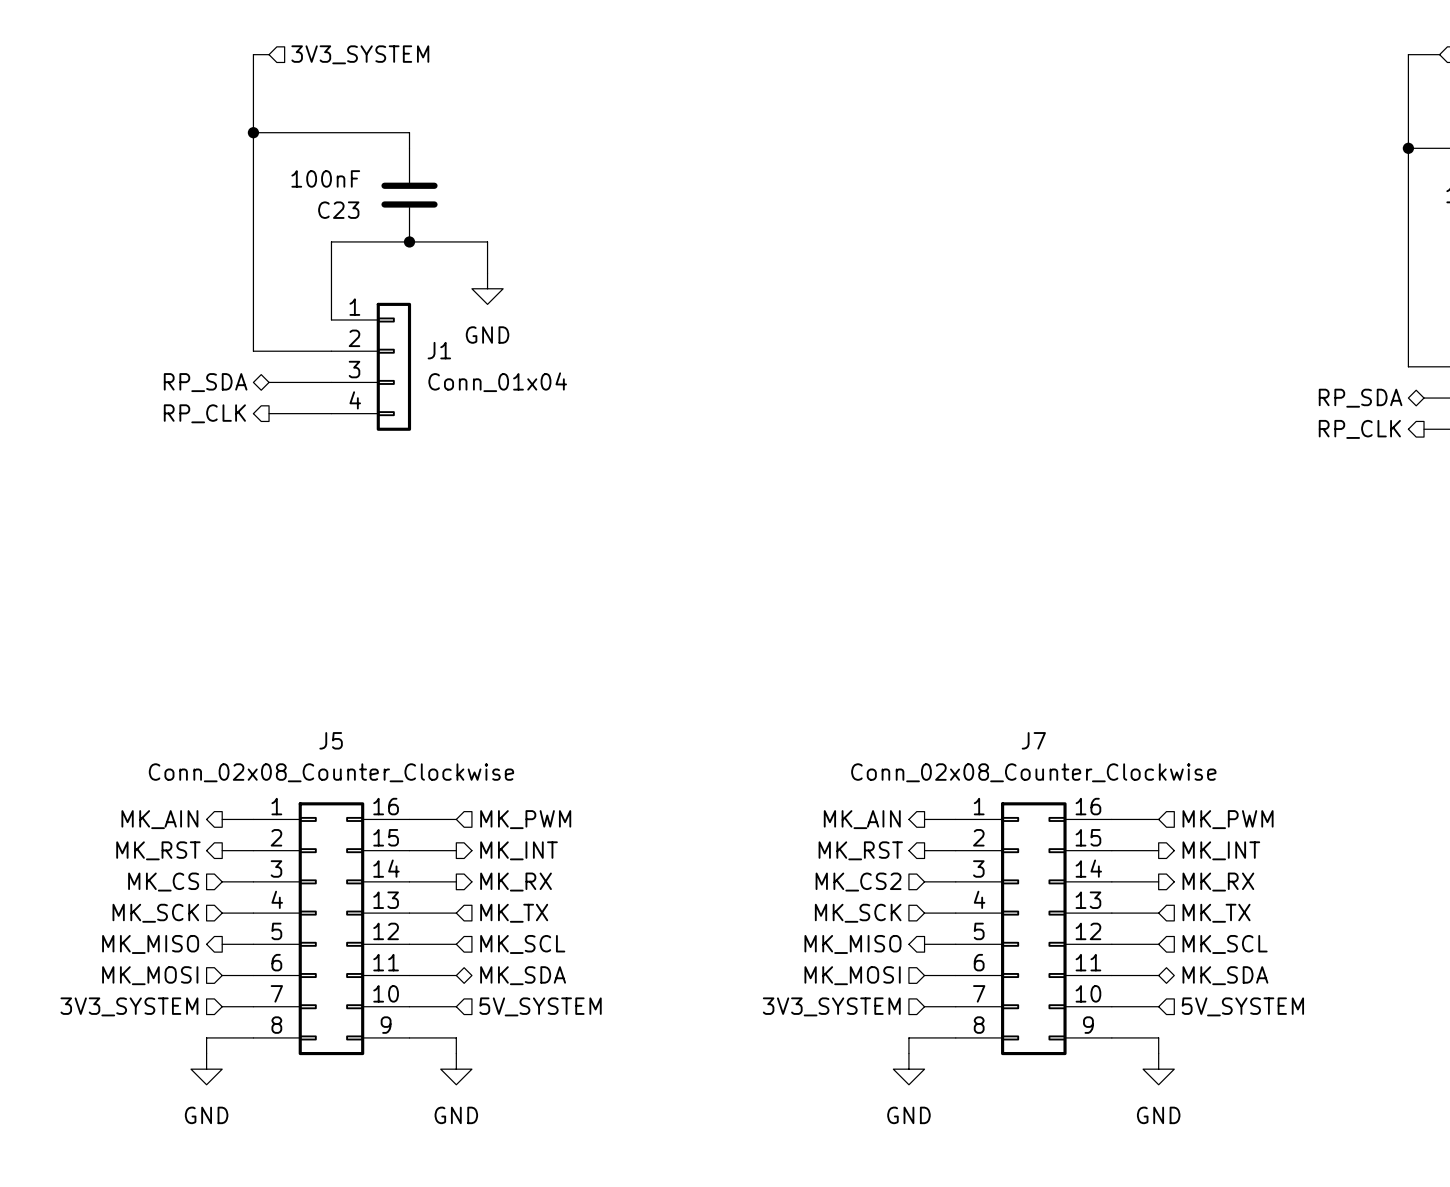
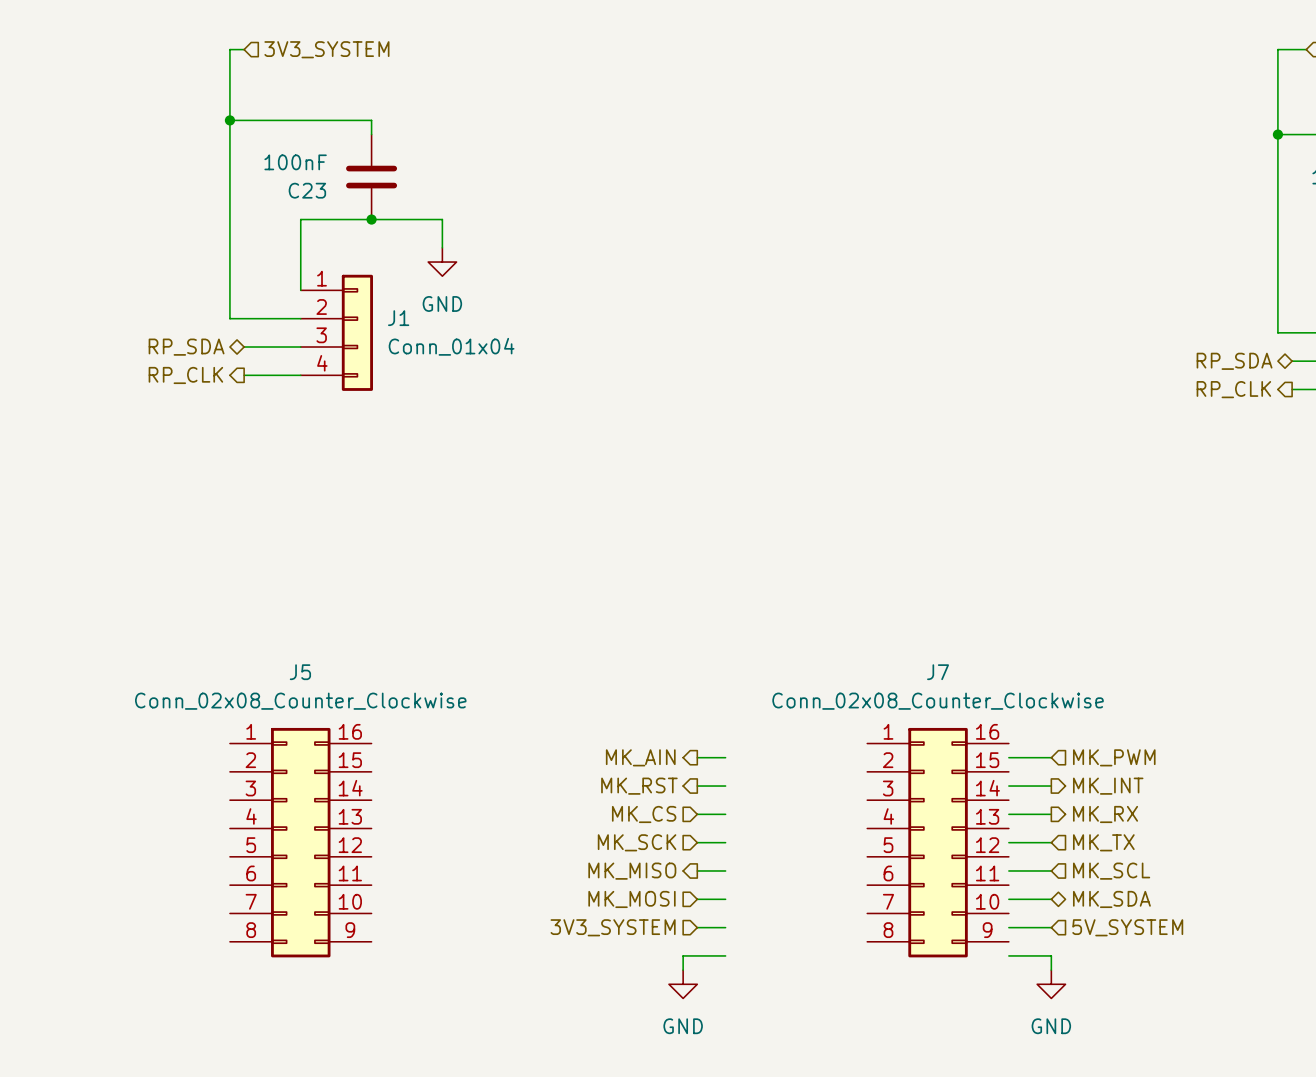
hierarchical label: MK_AIN (159, 819) -> none
wire: (222, 819) (253, 819) -> none
wire: (409, 819) (456, 819) -> none
hierarchical label: MK_PWM (525, 819) -> none
hierarchical label position: MK_AIN (862, 819) -> MK_AIN (640, 757)
wire: (924, 819) (955, 819) -> (697, 757) (725, 757)
wire: (1111, 819) (1158, 819) -> (1008, 757) (1051, 757)
hierarchical label position: MK_PWM (1228, 819) -> MK_PWM (1114, 757)
hierarchical label: MK_RST (158, 850) -> none
wire: (222, 850) (253, 850) -> none
wire: (409, 850) (456, 850) -> none
hierarchical label: MK_INT (519, 850) -> none
hierarchical label position: MK_RST (860, 850) -> MK_RST (639, 786)
wire: (924, 850) (955, 850) -> (697, 786) (725, 786)
wire: (1111, 850) (1158, 850) -> (1008, 786) (1051, 786)
hierarchical label position: MK_INT (1221, 850) -> MK_INT (1108, 786)
wire: (222, 881) (253, 881) -> none
wire: (409, 881) (456, 881) -> none
wire: (924, 881) (955, 881) -> (697, 814) (725, 814)
wire: (1111, 881) (1158, 881) -> (1008, 814) (1051, 814)
hierarchical label: MK_CS (163, 882) -> none
hierarchical label: MK_RX (516, 882) -> none
hierarchical label: MK_CS2 (858, 882) -> none
hierarchical label position: MK_RX (1218, 882) -> MK_RX (1105, 814)
hierarchical label: none -> MK_CS (644, 814)
hierarchical label: MK_SCK (155, 913) -> none
wire: (222, 913) (253, 913) -> none
wire: (409, 913) (456, 913) -> none
hierarchical label: MK_TX (514, 913) -> none
hierarchical label position: MK_SCK (858, 913) -> MK_SCK (637, 842)
wire: (924, 913) (955, 913) -> (697, 842) (725, 842)
wire: (1111, 913) (1158, 913) -> (1008, 842) (1051, 842)
hierarchical label position: MK_TX (1216, 913) -> MK_TX (1103, 842)
hierarchical label: MK_MISO (150, 944) -> none
wire: (222, 944) (253, 944) -> none
wire: (409, 944) (456, 944) -> none
hierarchical label: MK_SCL (522, 944) -> none
hierarchical label position: MK_MISO (852, 944) -> MK_MISO (632, 871)
wire: (924, 944) (955, 944) -> (697, 870) (725, 870)
wire: (1111, 944) (1158, 944) -> (1008, 870) (1051, 870)
hierarchical label position: MK_SCL (1225, 944) -> MK_SCL (1111, 871)
hierarchical label: MK_MOSI (150, 975) -> none
wire: (222, 975) (253, 975) -> none
wire: (409, 975) (456, 975) -> none
hierarchical label: MK_SDA (523, 975) -> none
hierarchical label position: MK_MOSI (852, 975) -> MK_MOSI (631, 899)
wire: (924, 975) (955, 975) -> (697, 899) (725, 899)
wire: (1111, 975) (1158, 975) -> (1008, 899) (1051, 899)
hierarchical label position: MK_SDA (1225, 975) -> MK_SDA (1111, 899)
hierarchical label: 3V3_SYSTEM (129, 1006) -> none
wire: (222, 1006) (253, 1006) -> none
wire: (409, 1006) (456, 1006) -> none
hierarchical label: 5V_SYSTEM (540, 1006) -> none
hierarchical label position: 3V3_SYSTEM (831, 1006) -> 3V3_SYSTEM (613, 927)
wire: (924, 1006) (955, 1006) -> (697, 927) (725, 927)
wire: (1111, 1006) (1158, 1006) -> (1008, 927) (1051, 927)
hierarchical label position: 5V_SYSTEM (1242, 1006) -> 5V_SYSTEM (1127, 927)
wire: (253, 1037) (206, 1037) (206, 1053) -> none
wire: (409, 1037) (456, 1037) (456, 1053) -> none
wire: (955, 1037) (908, 1037) (908, 1053) -> (725, 955) (683, 955) (683, 970)
wire: (1111, 1037) (1158, 1037) (1158, 1053) -> (1008, 955) (1051, 955) (1051, 970)
power symbol: GND (206, 1069) -> none
power symbol: GND (456, 1069) -> none
power symbol: GND (908, 1069) -> none
power symbol position: GND (1158, 1069) -> GND (1051, 984)
power symbol: none -> GND (683, 984)

